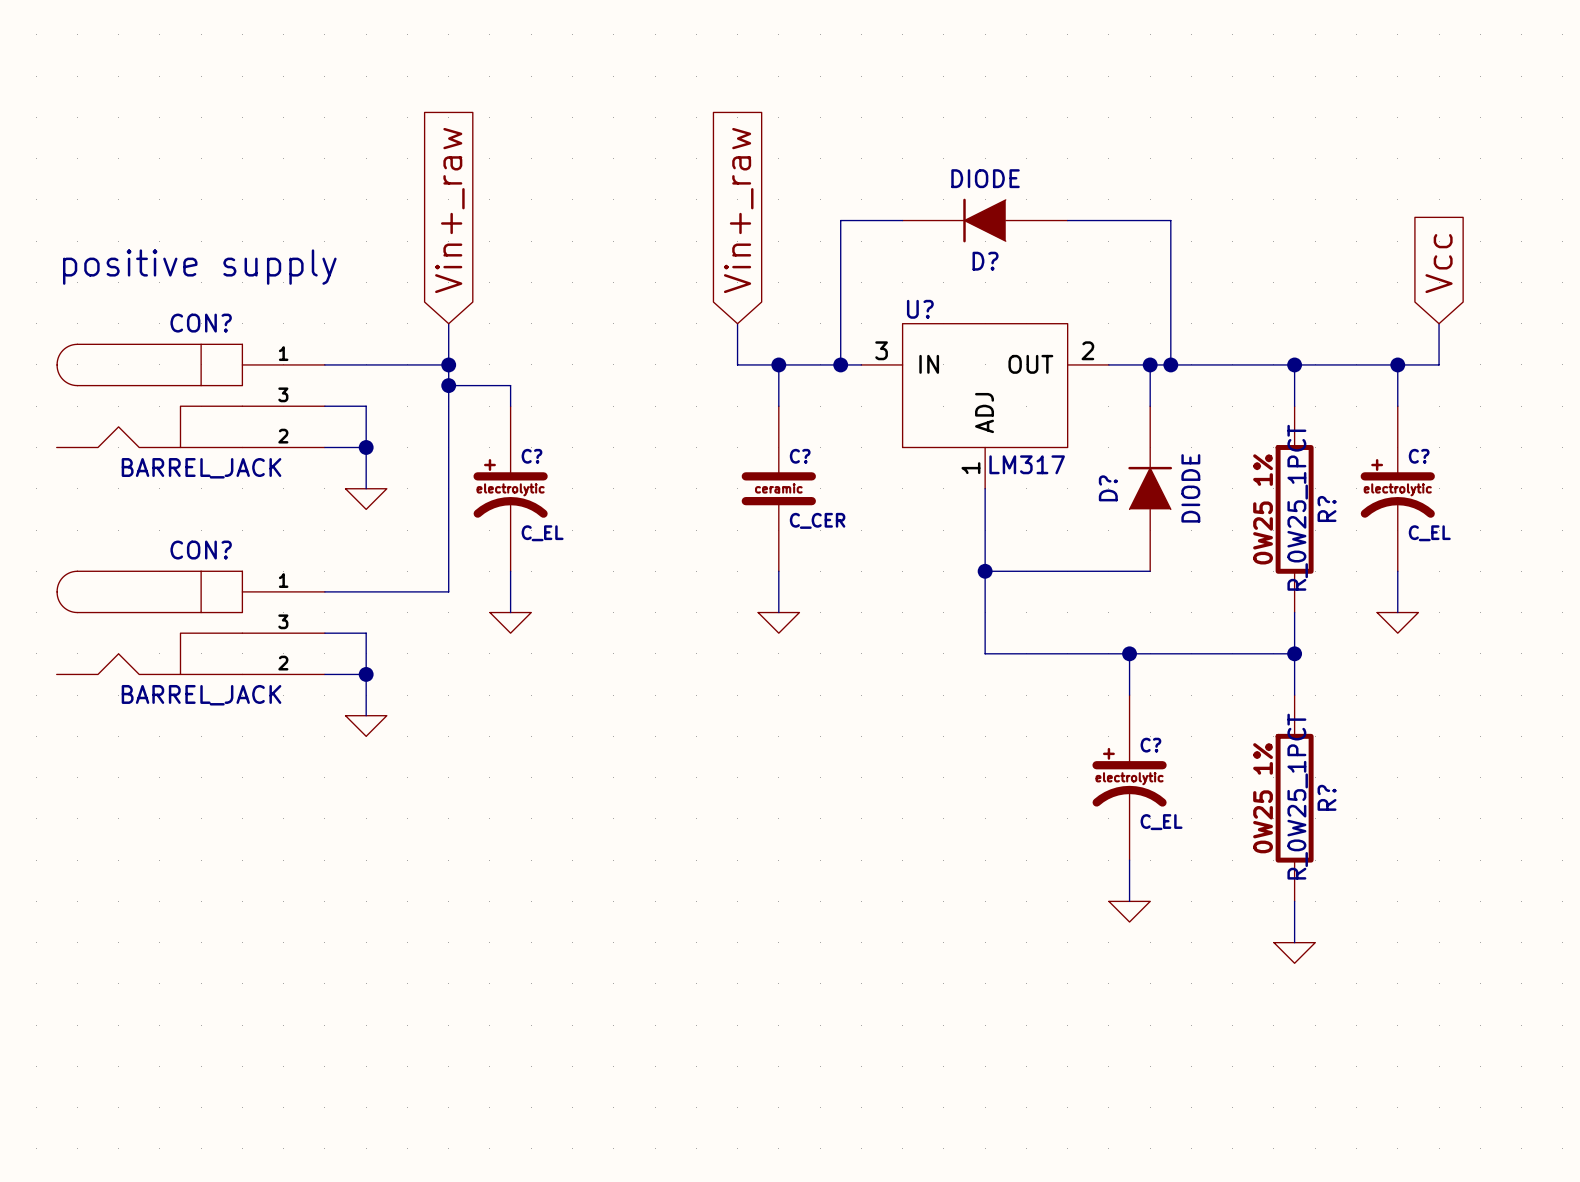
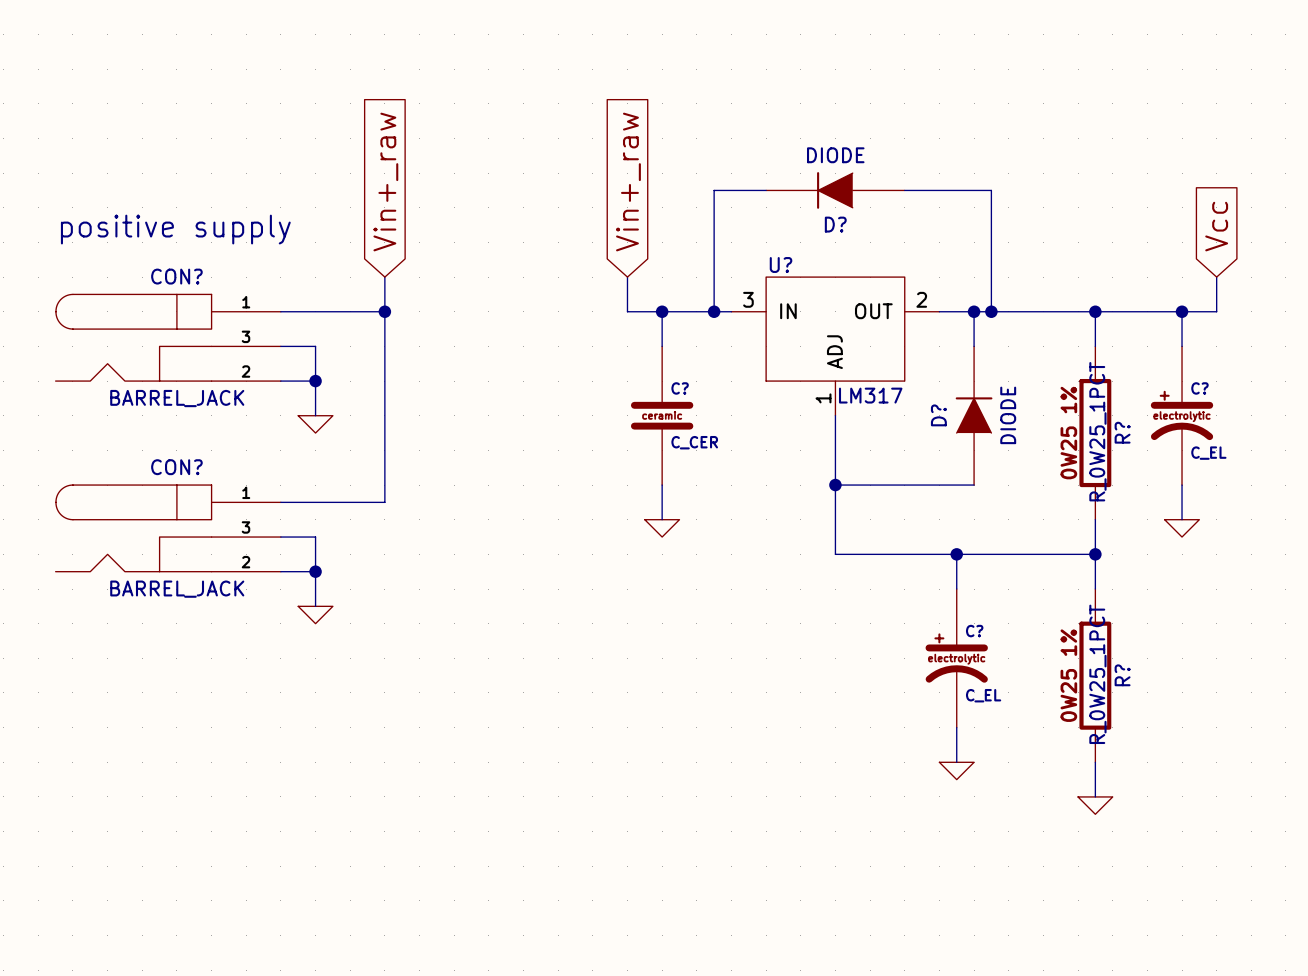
wire: (448, 385) (510, 385) (510, 406) -> none
junction: (448, 385) -> none
C?: C_EL (510, 488) -> none
wire: (510, 571) (510, 612) -> none
power symbol: (510, 622) -> none

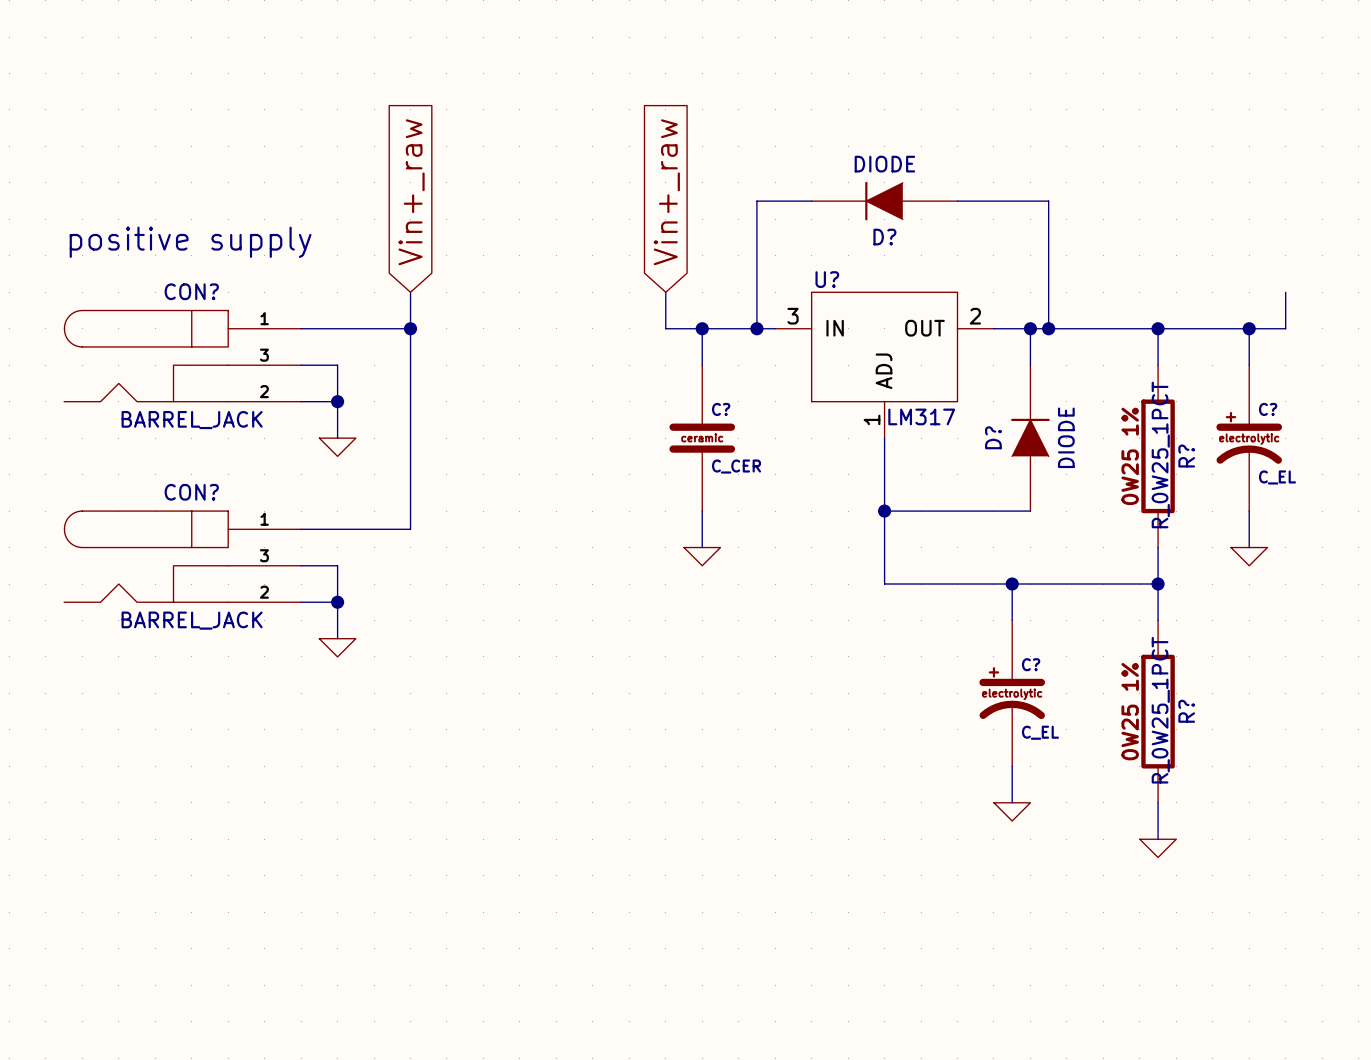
global label: Vcc (1216, 226) -> none

